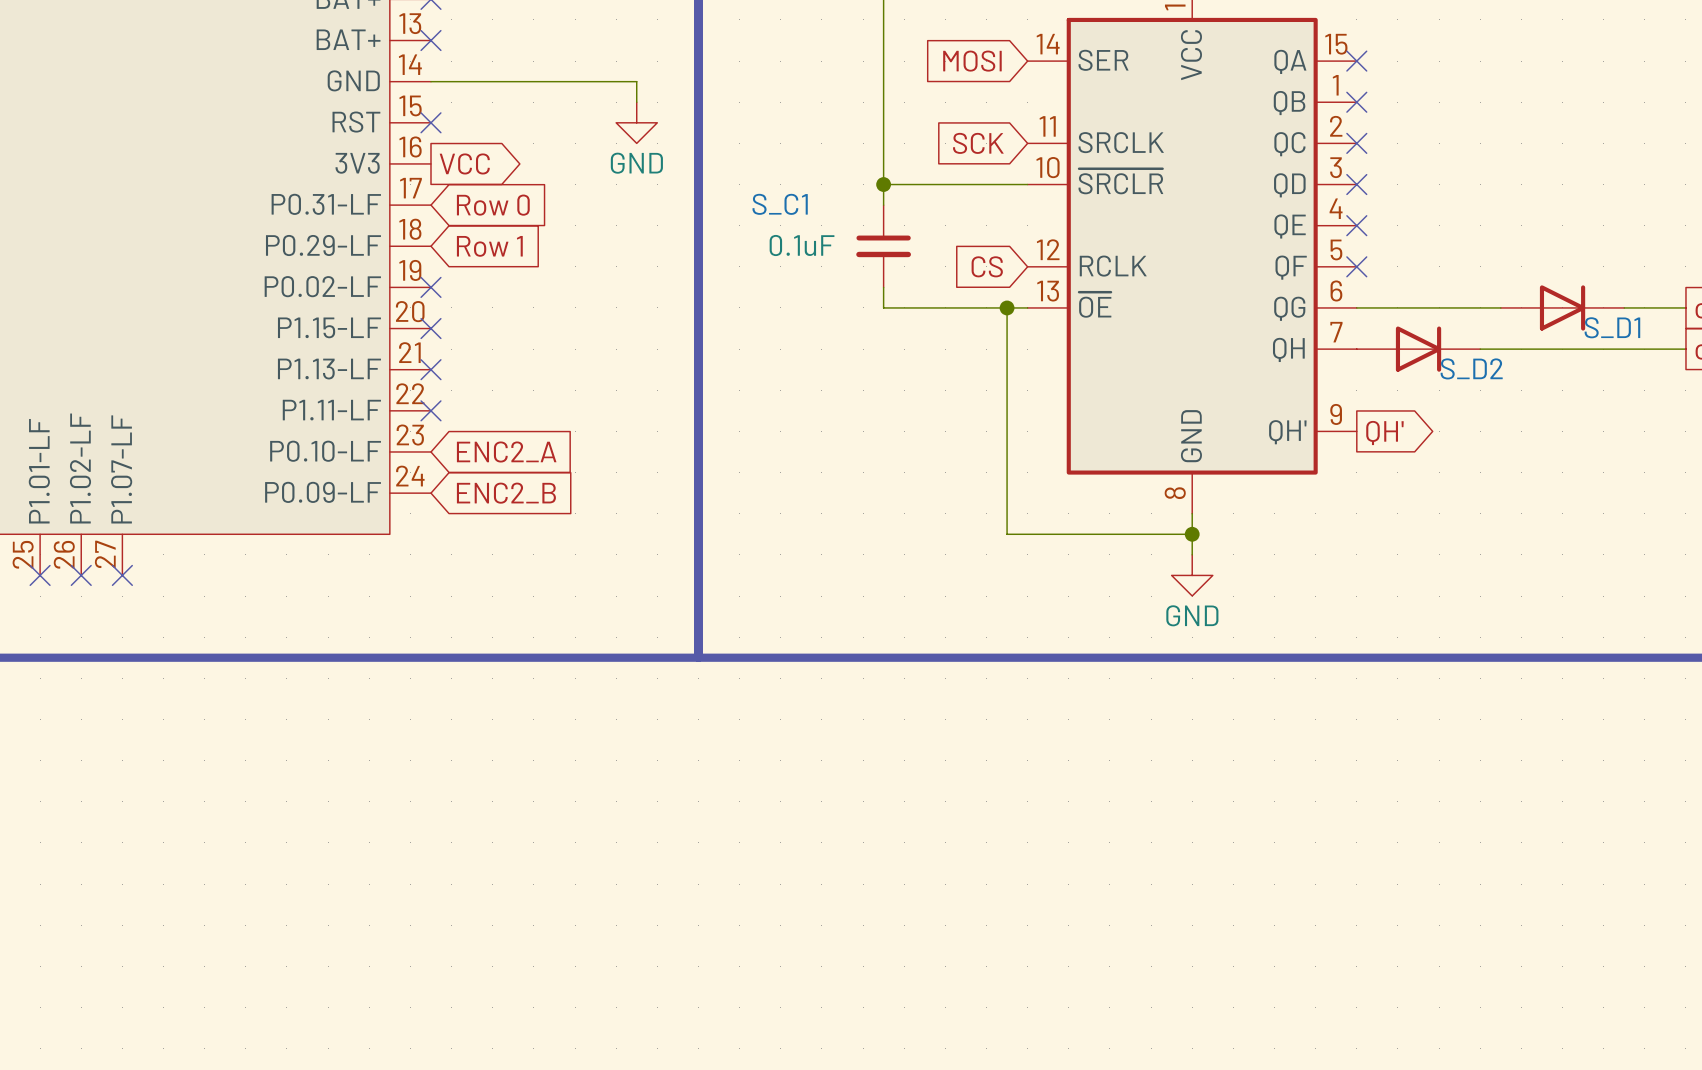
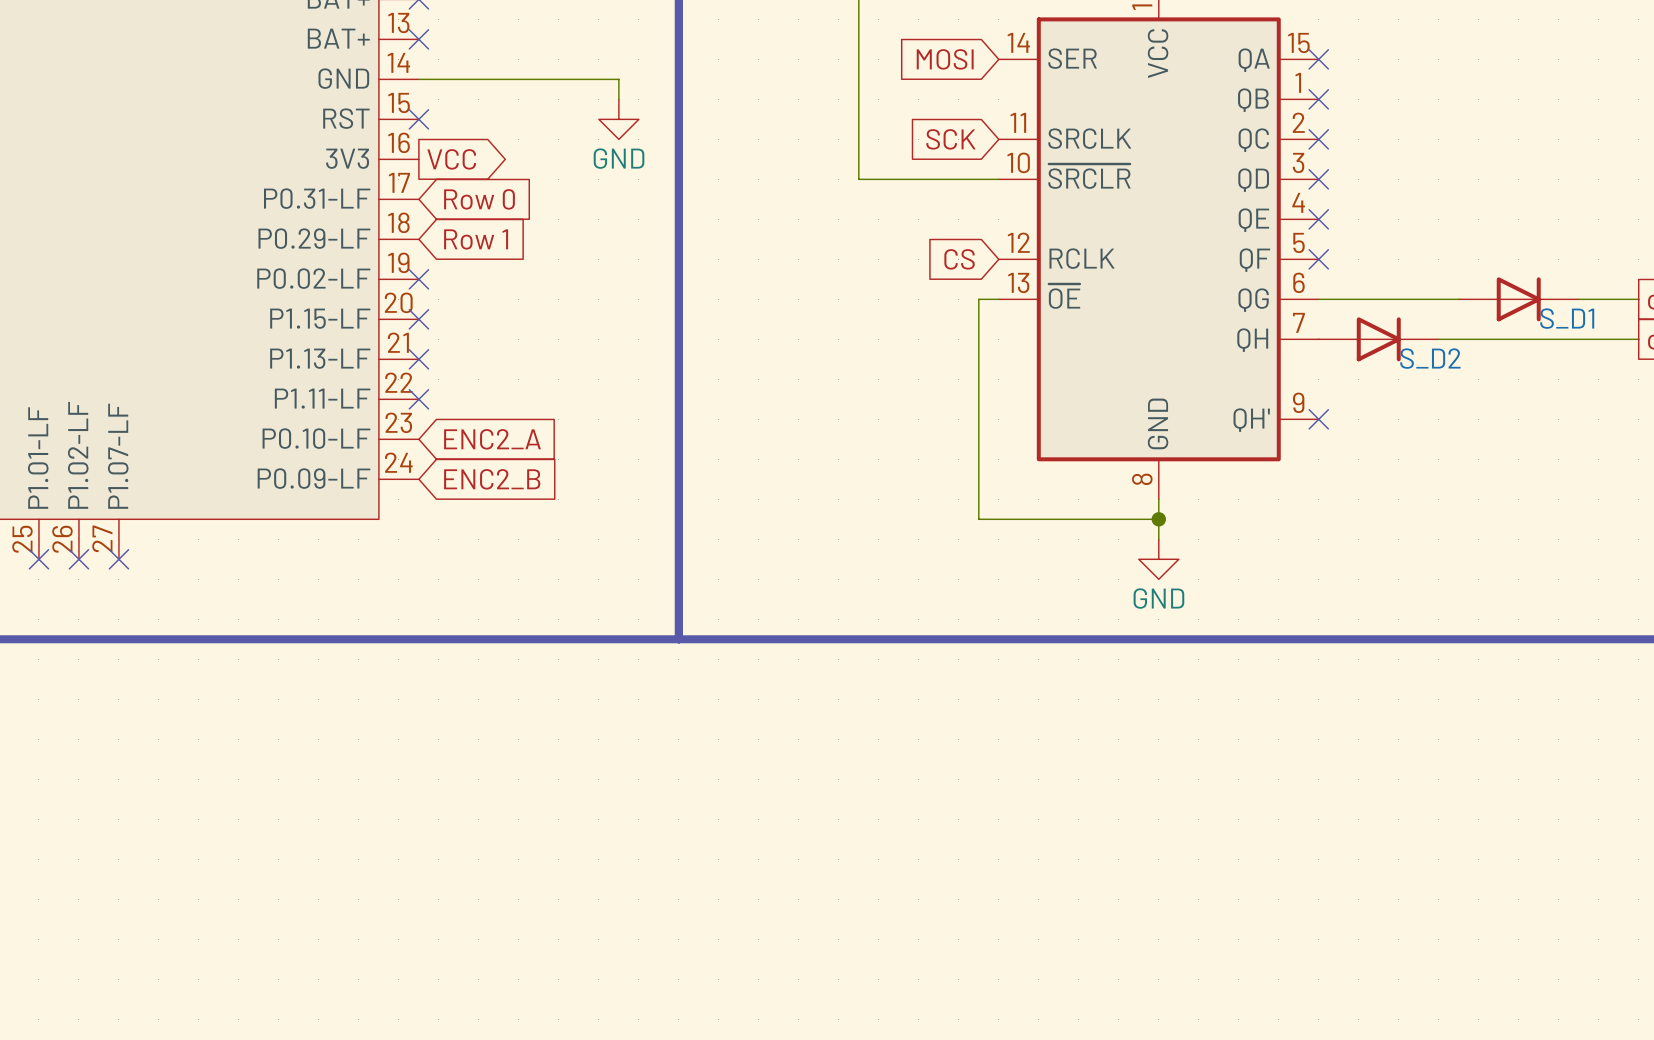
wire: (883, 184) (883, 205) -> none
junction: (883, 184) -> none
S_C1: 0.1uF (883, 246) -> none
wire: (883, 287) (883, 307) (1007, 307) -> none
junction: (1007, 307) -> none
no-connect mark: none -> (1318, 419)
global label: QH' (1384, 432) -> none

